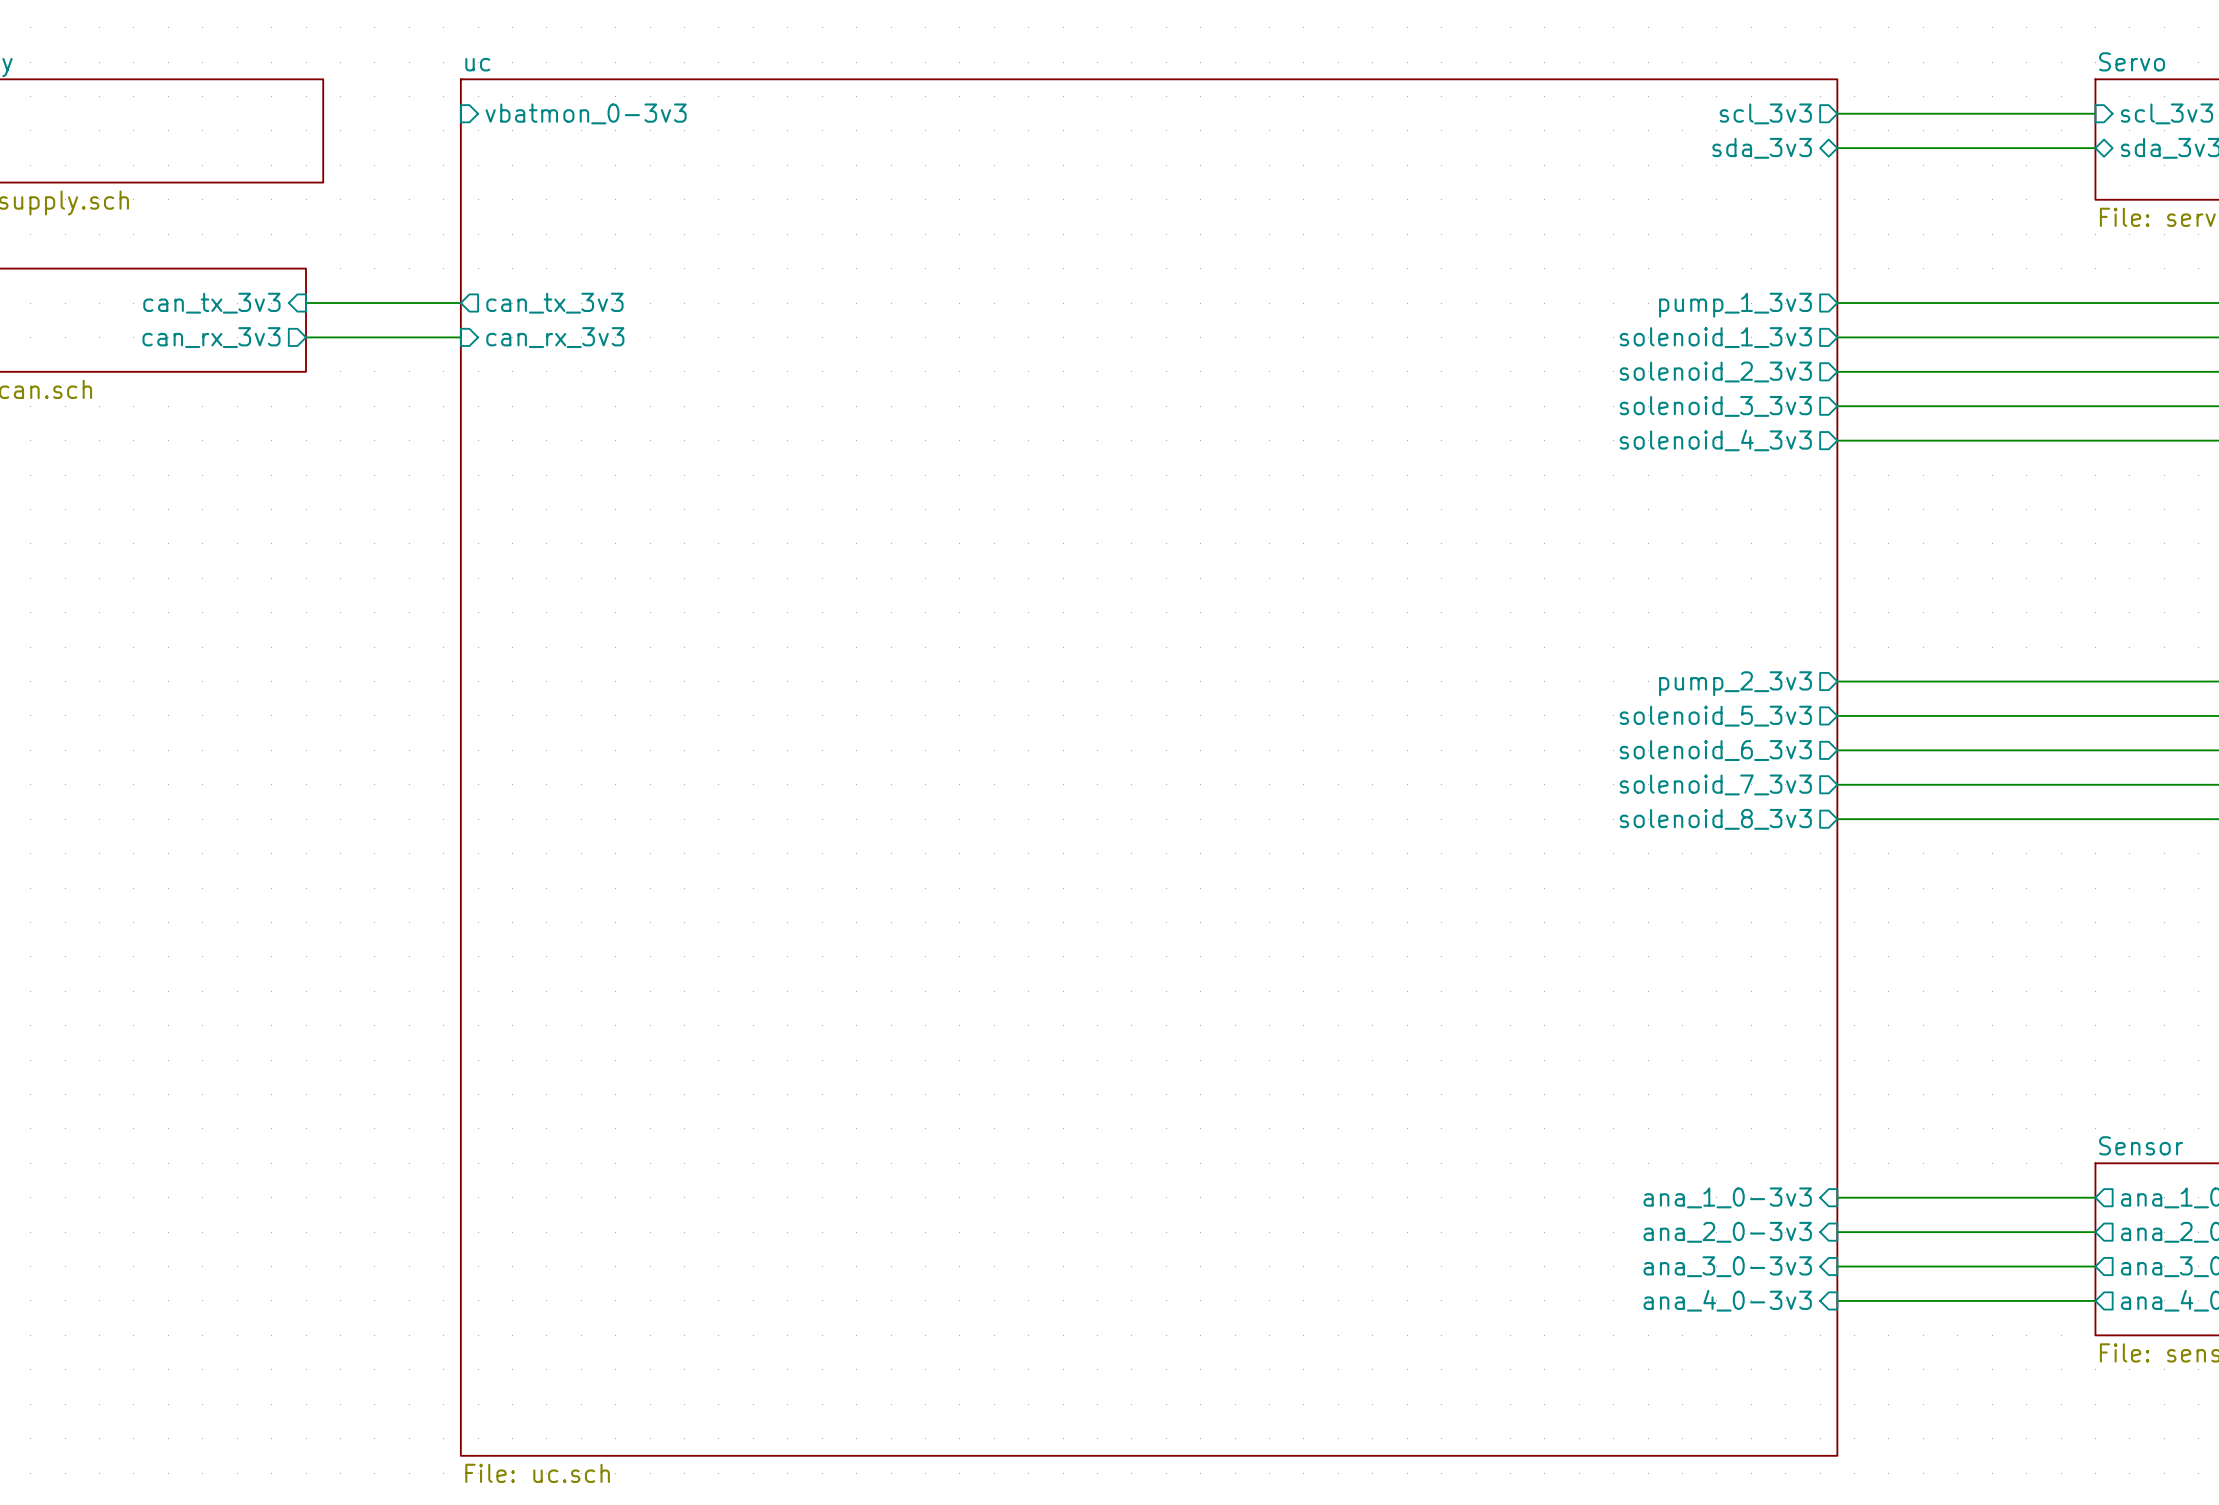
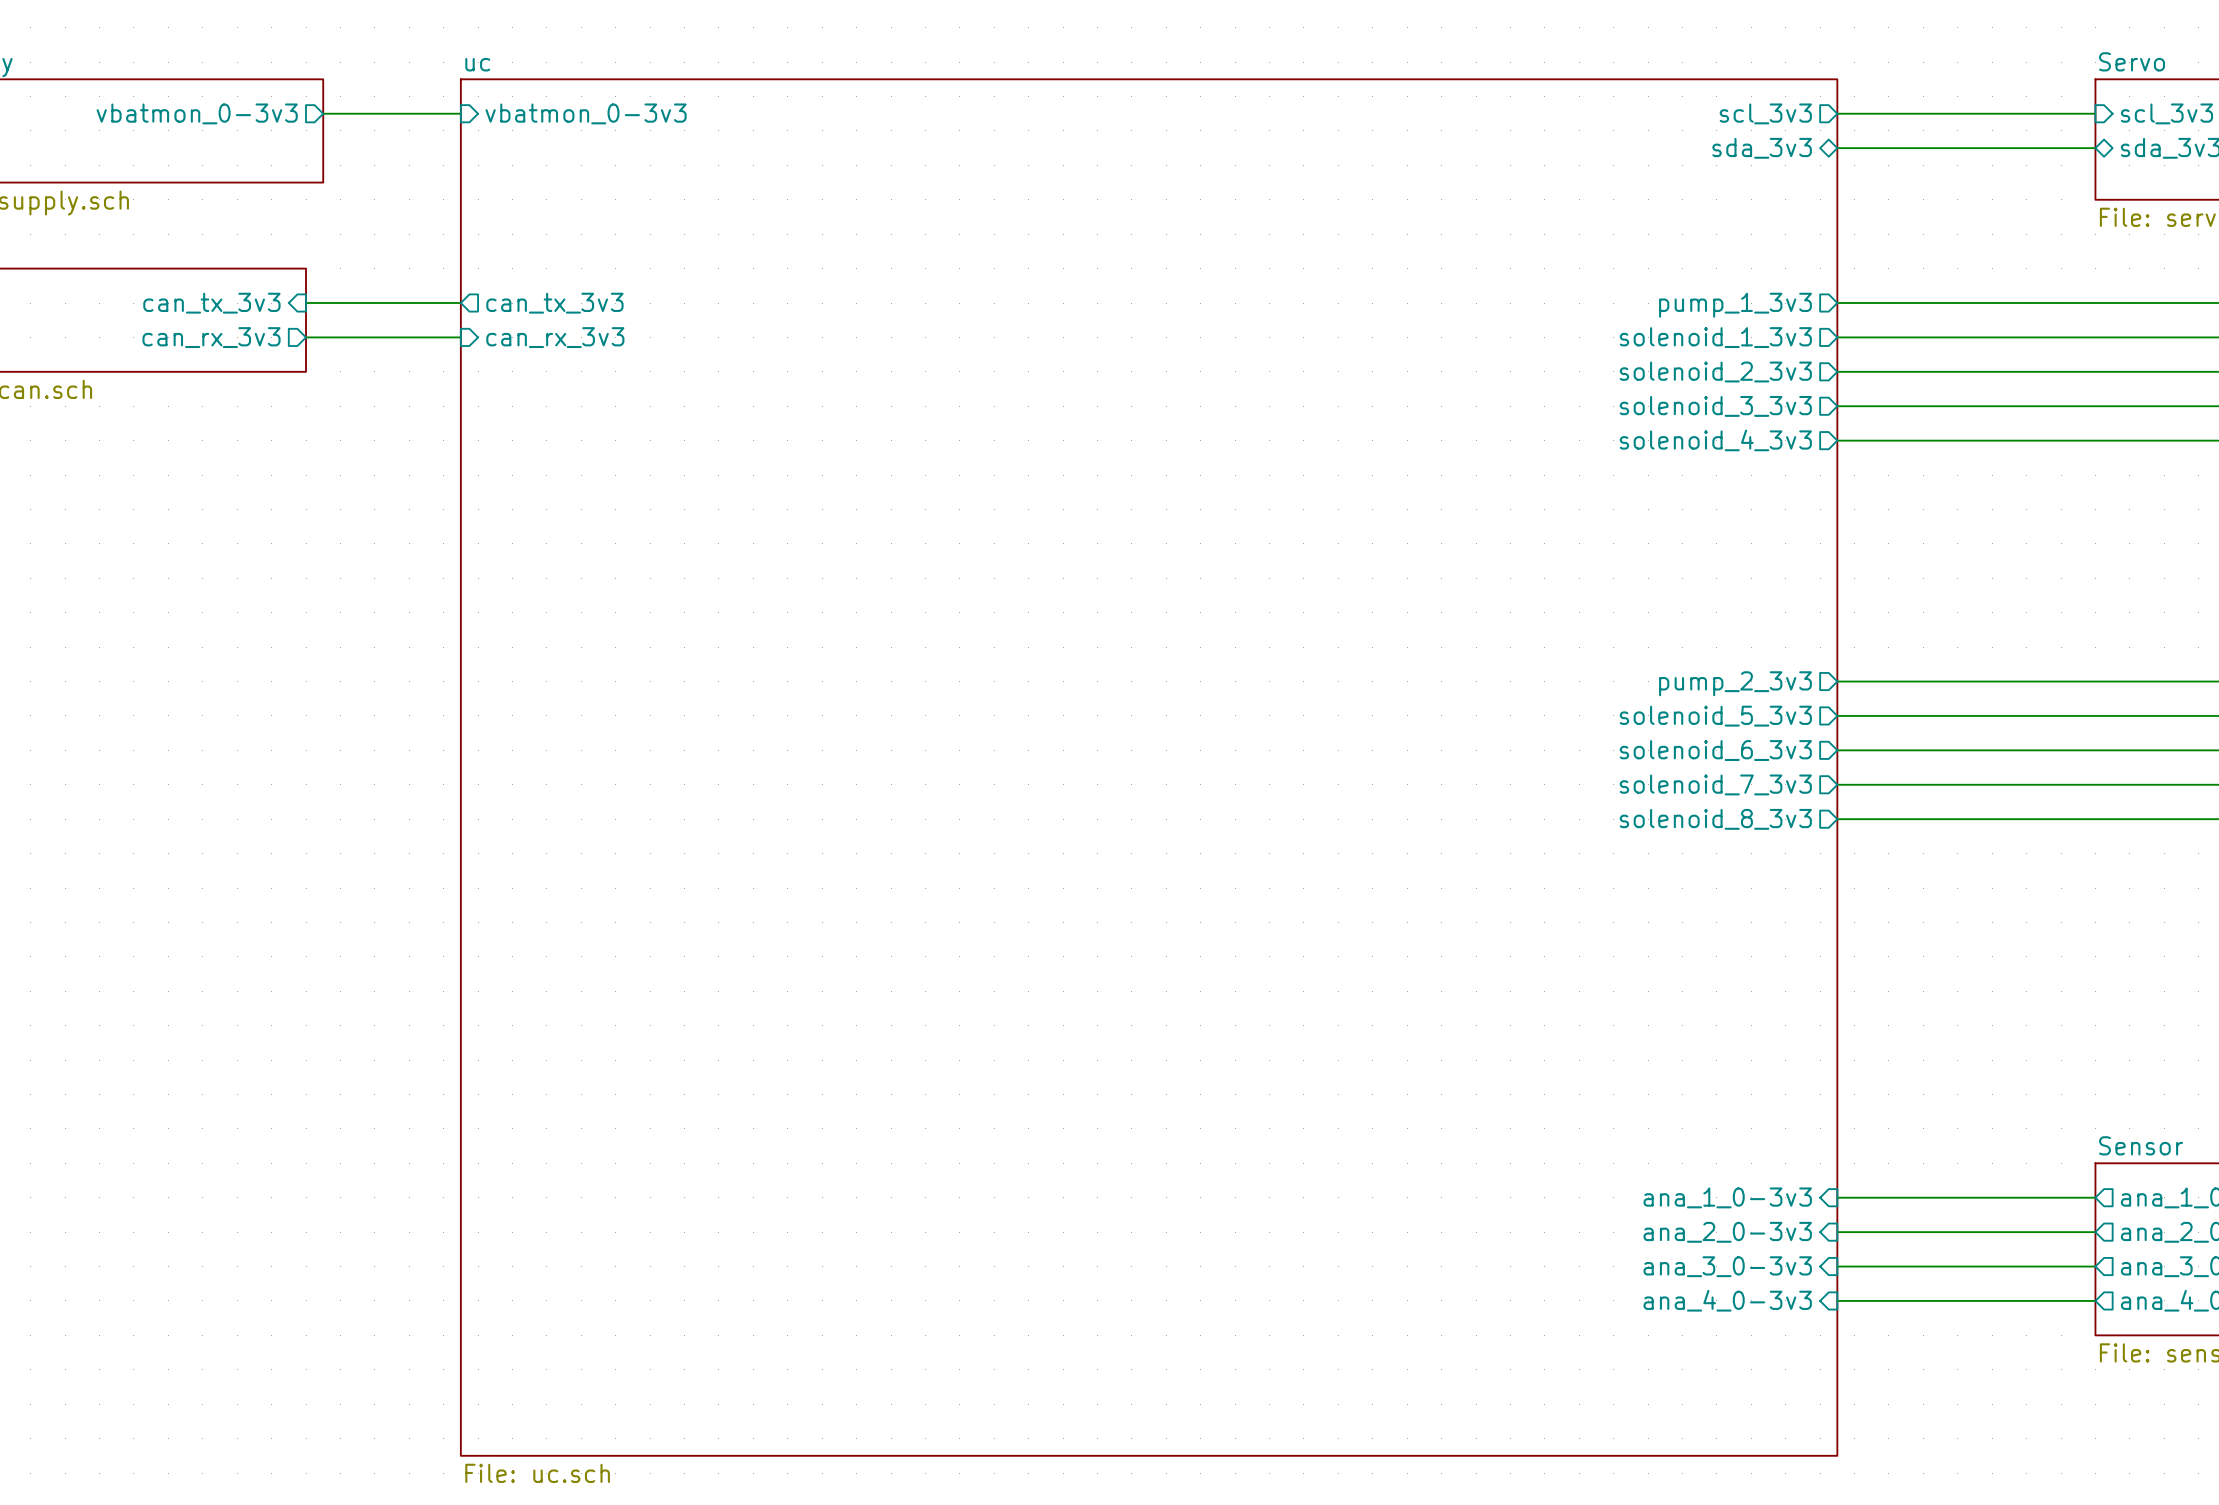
sheet pin: none -> vbatmon_0-3v3 (197, 113)
wire: none -> (323, 113) (460, 113)

